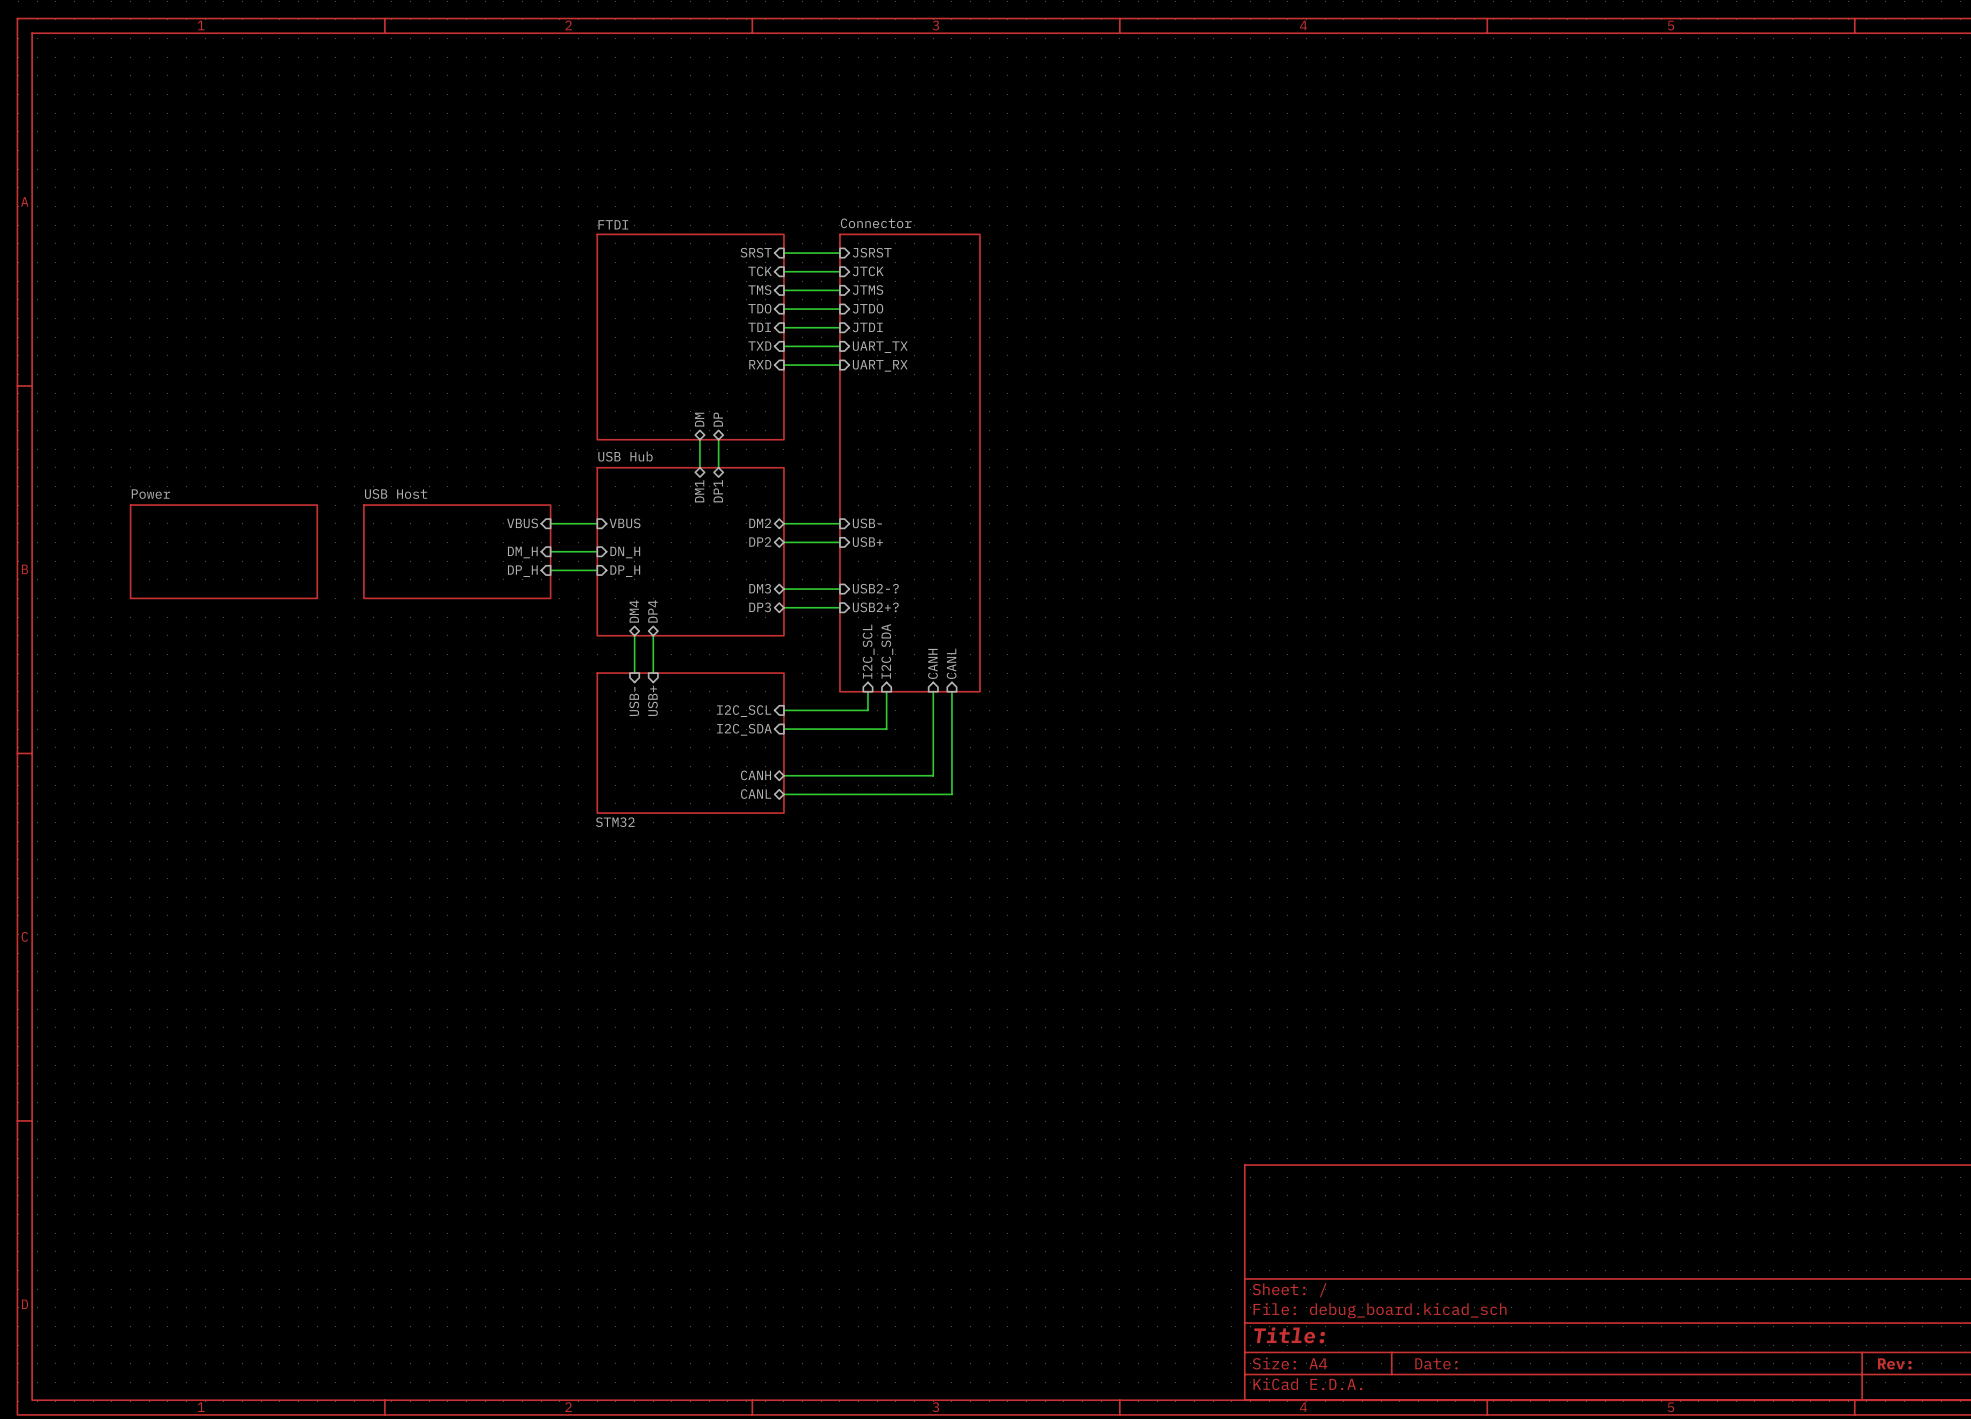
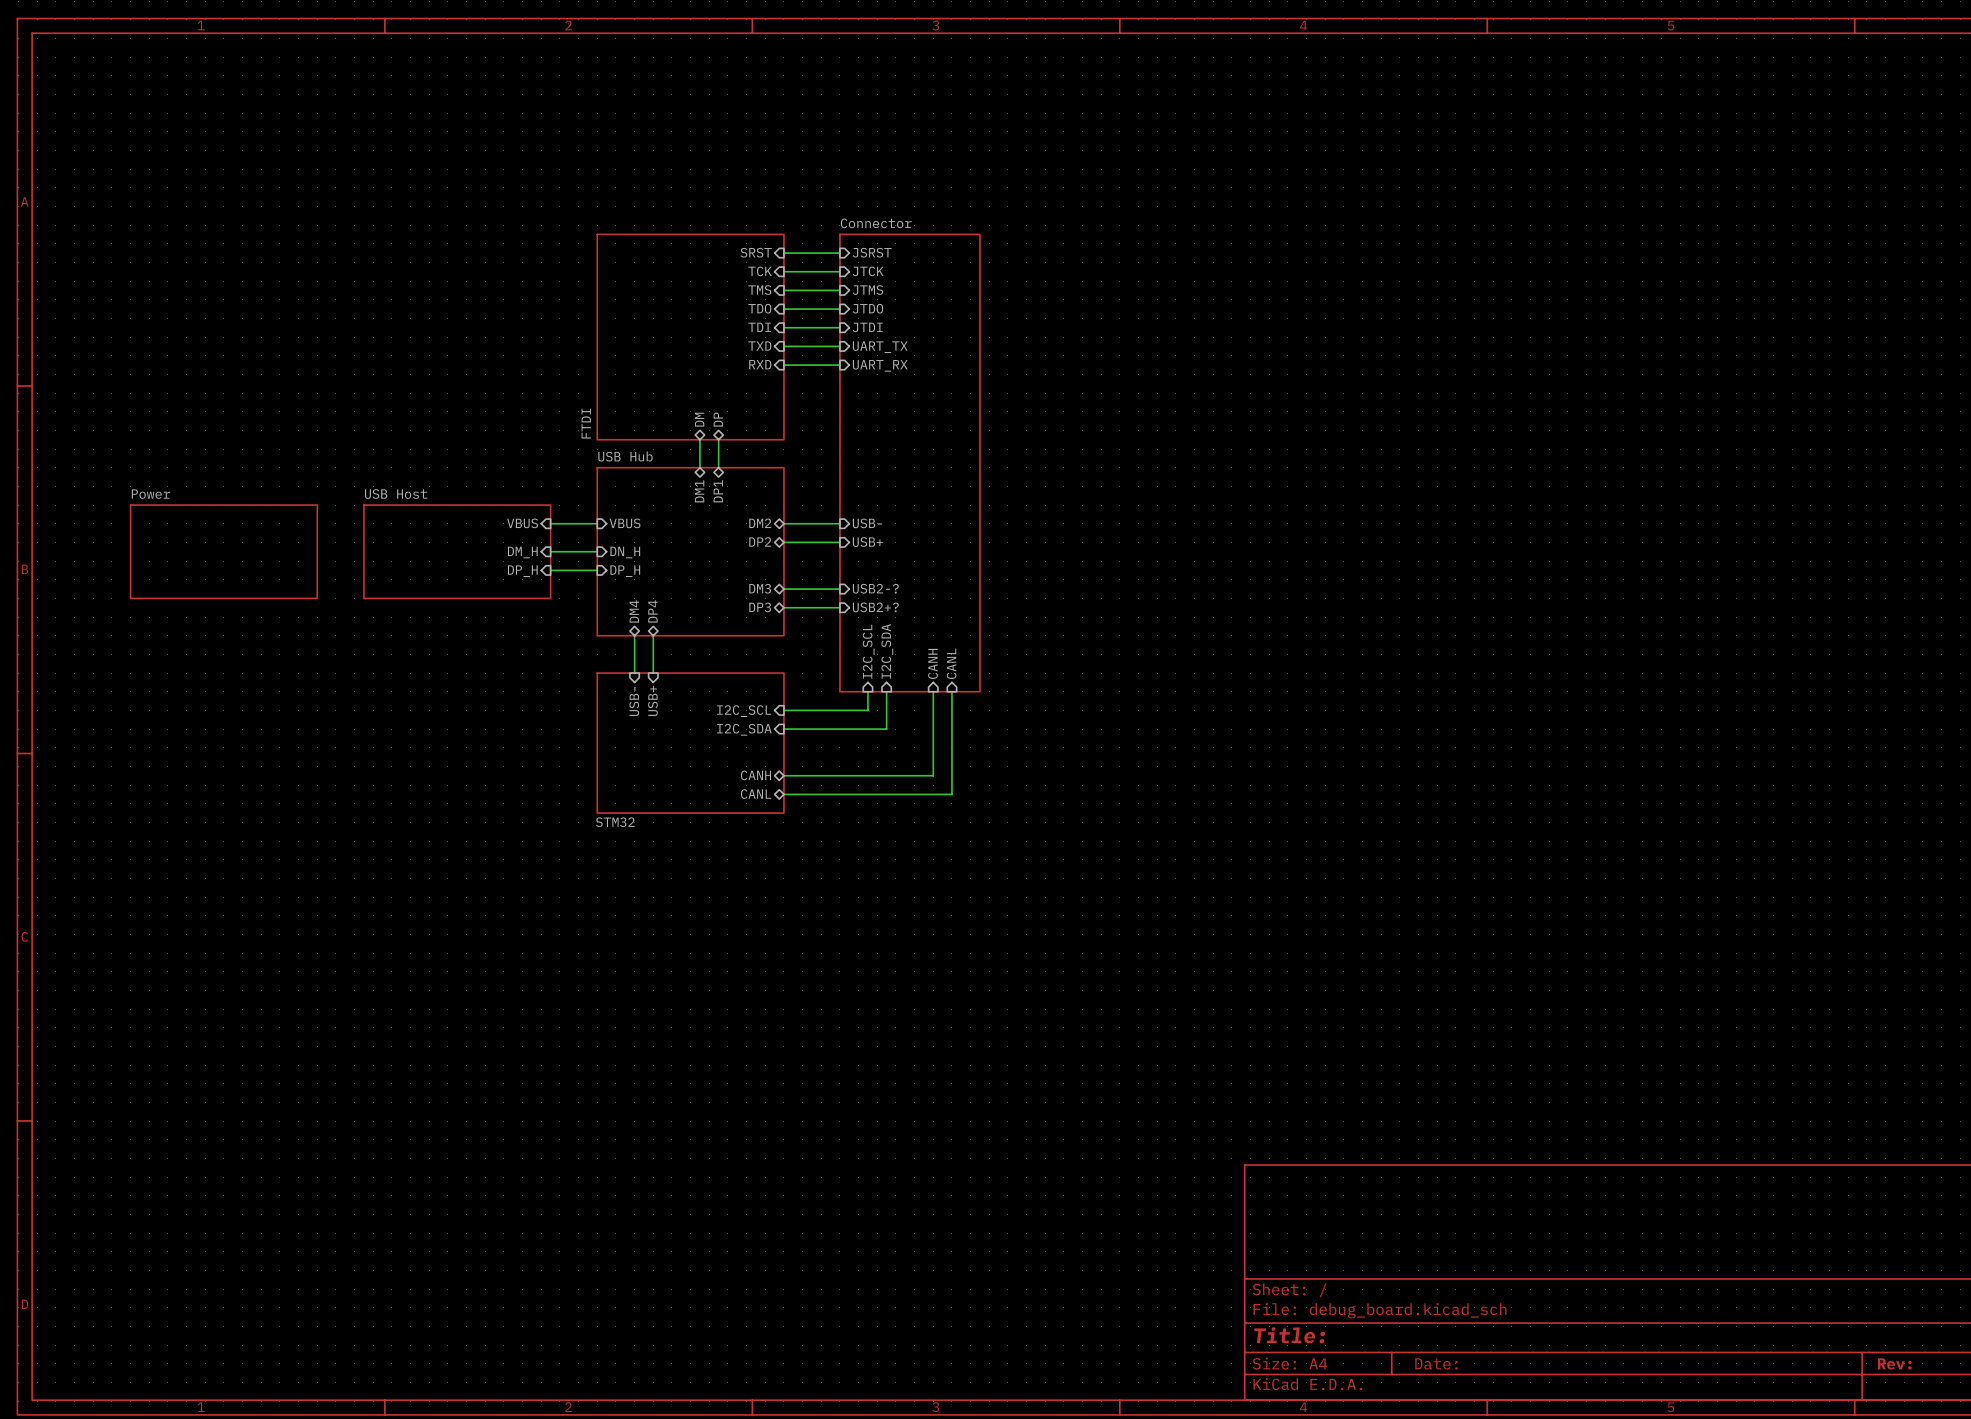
sheet FTDI name rotation: 0° (613, 224) -> 90° counterclockwise (586, 423)
sheet FTDI name position: FTDI (613, 224) -> FTDI (586, 423)

